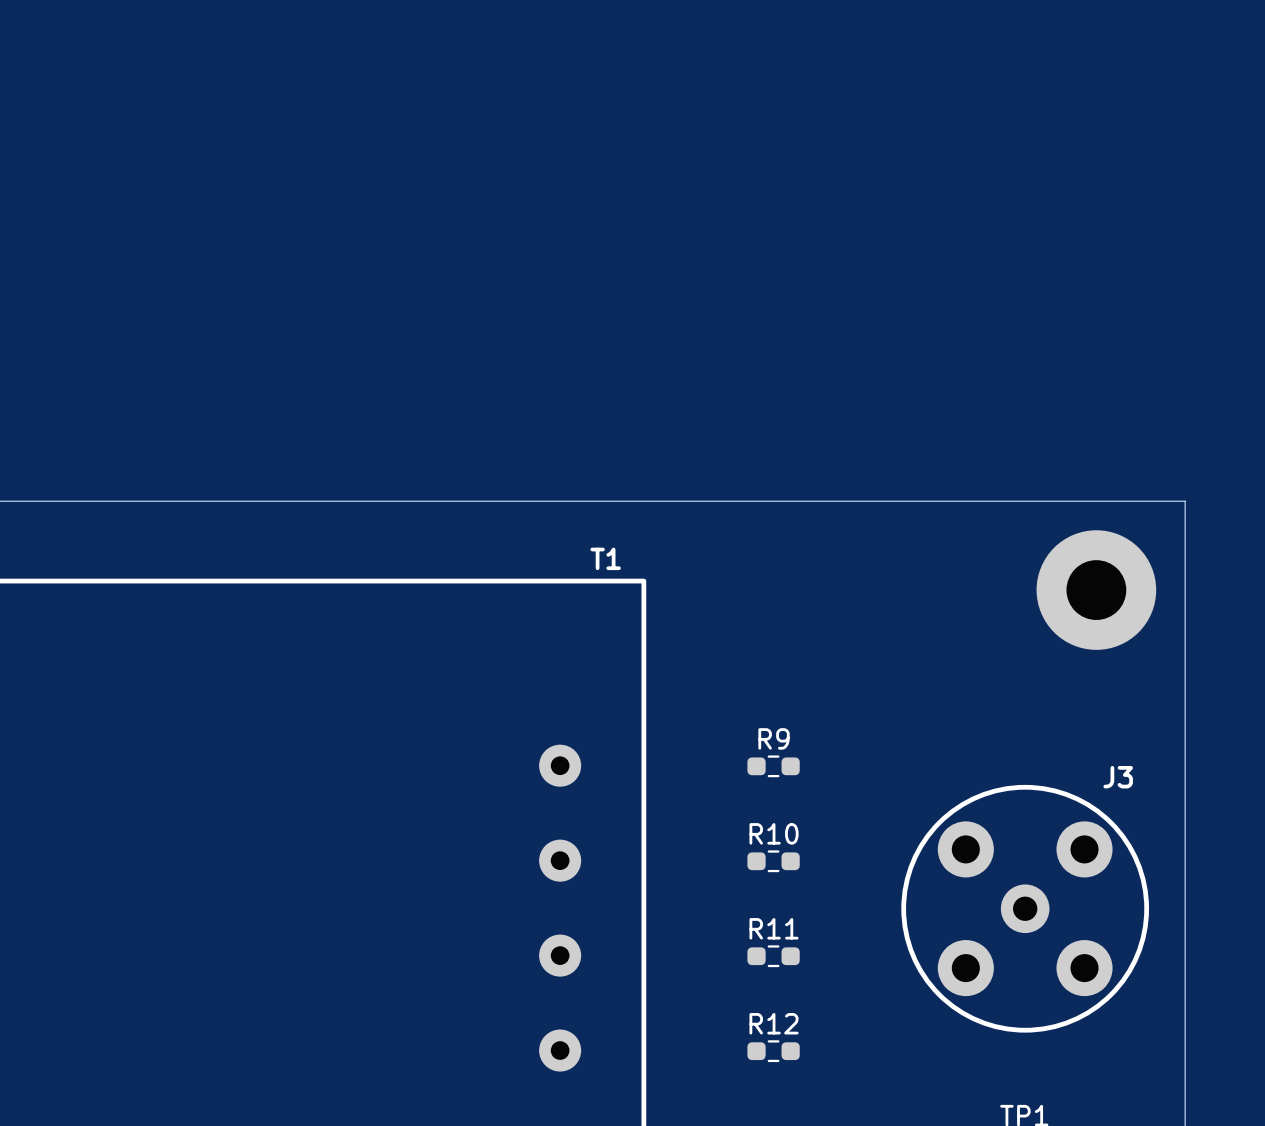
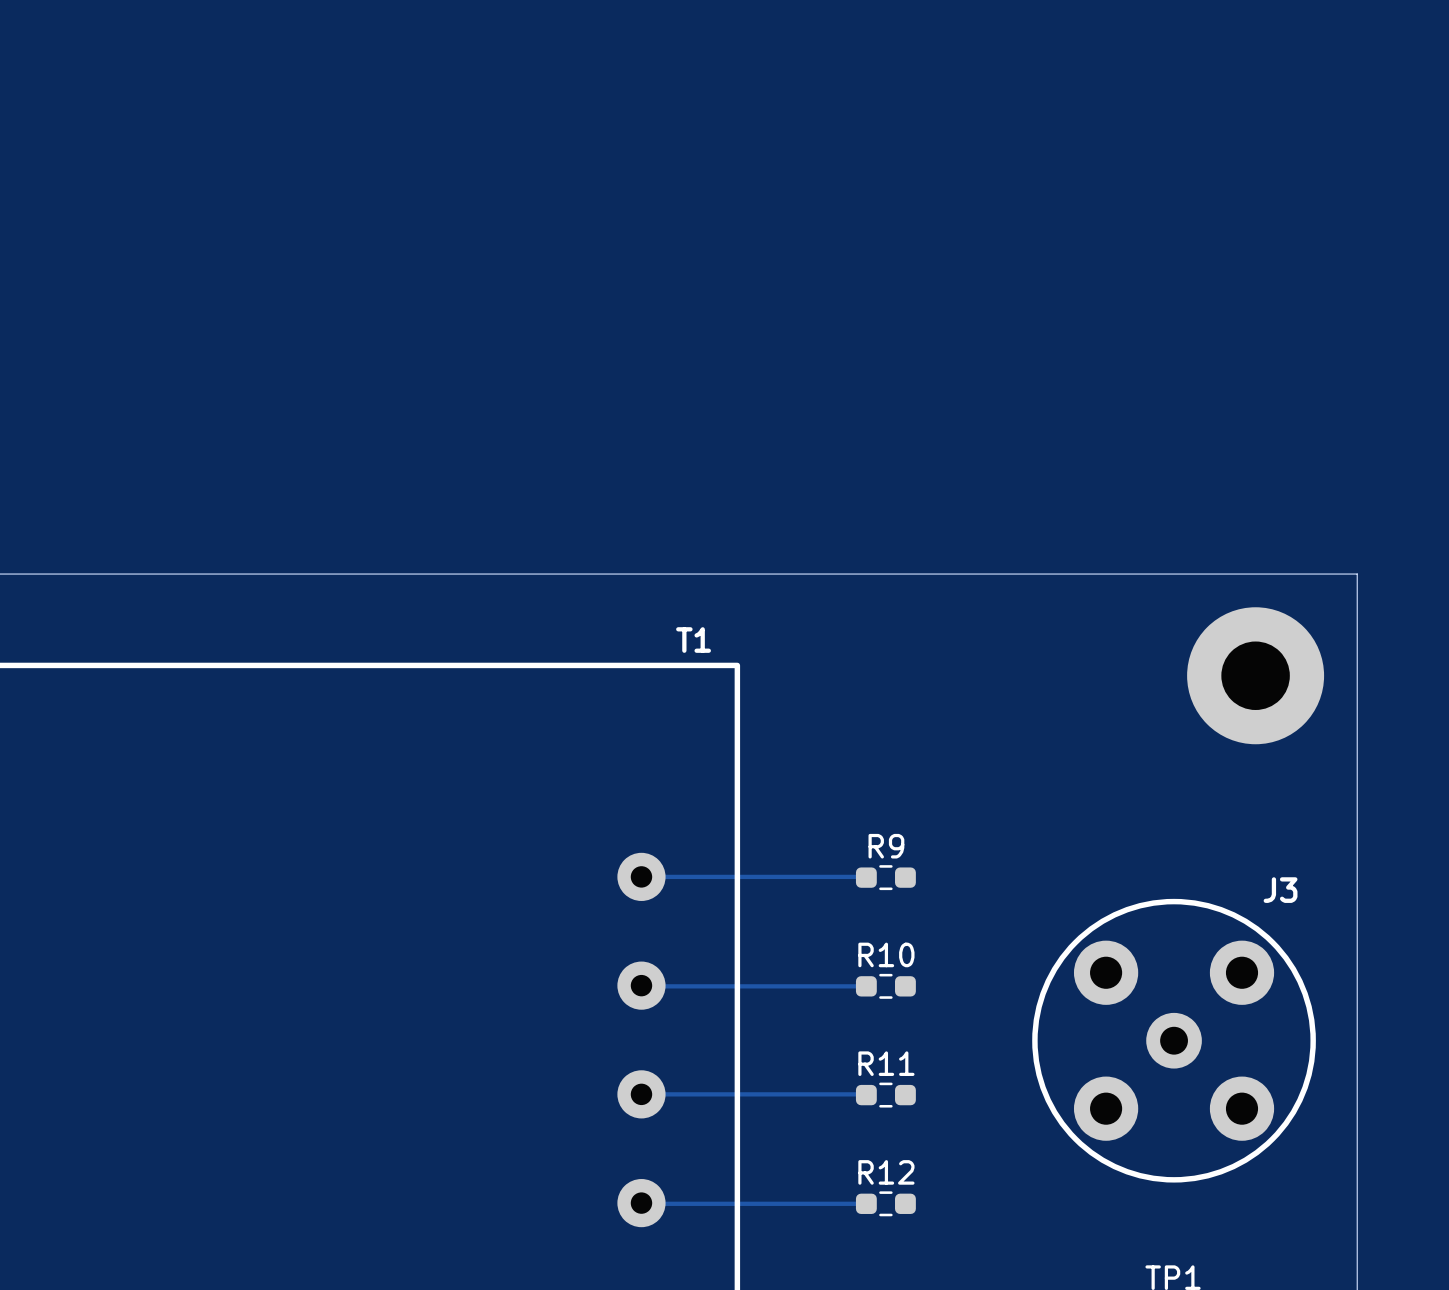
track: none -> (641, 876) (866, 877)
track: none -> (641, 985) (866, 986)
track: none -> (641, 1094) (866, 1095)
track: none -> (641, 1203) (866, 1203)

